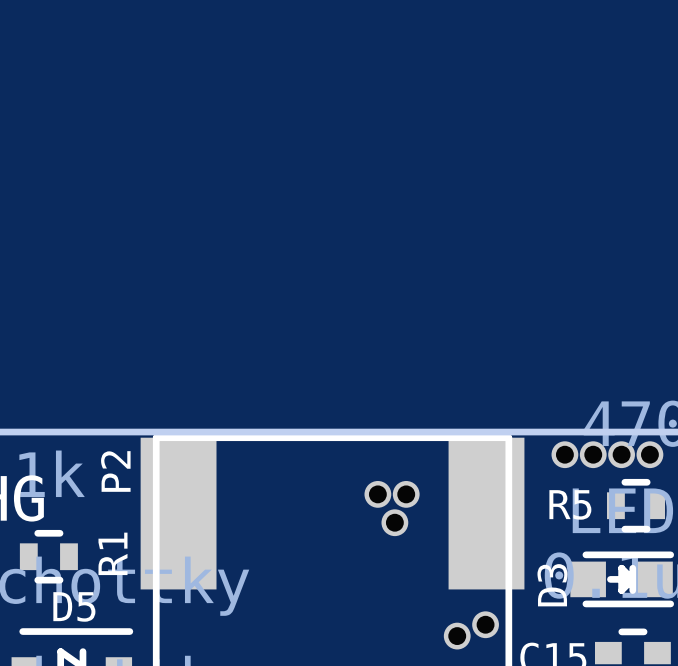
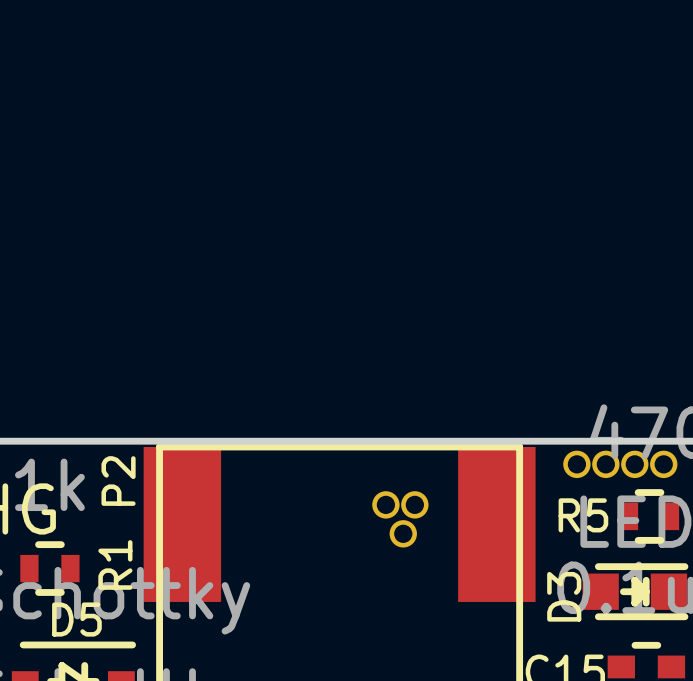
part: (485, 624) -> none
part: (457, 636) -> none

